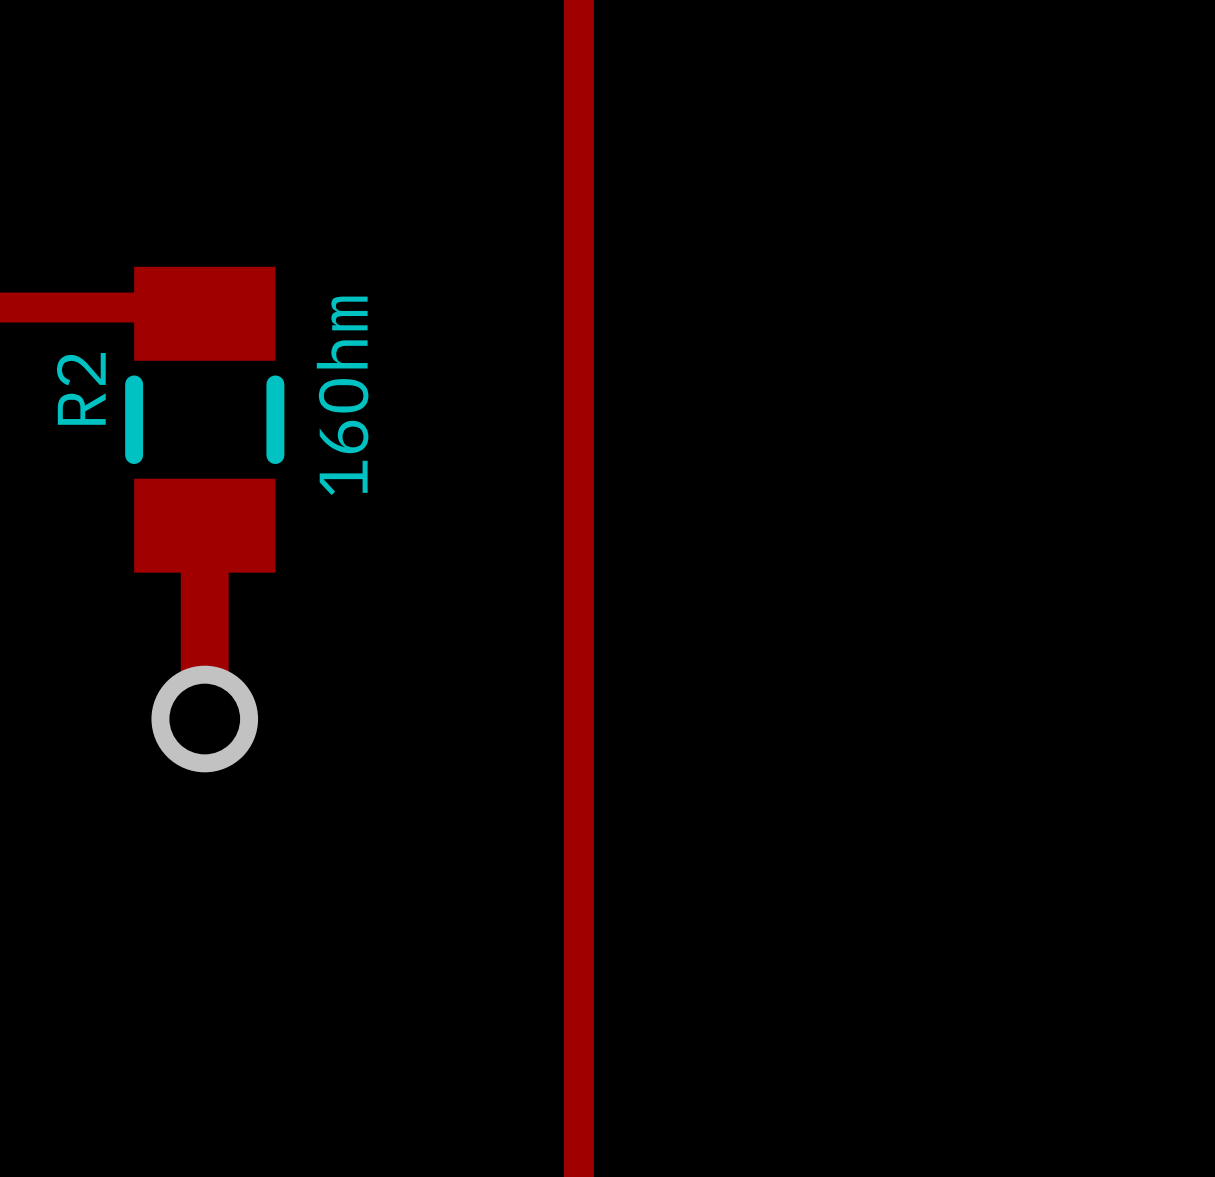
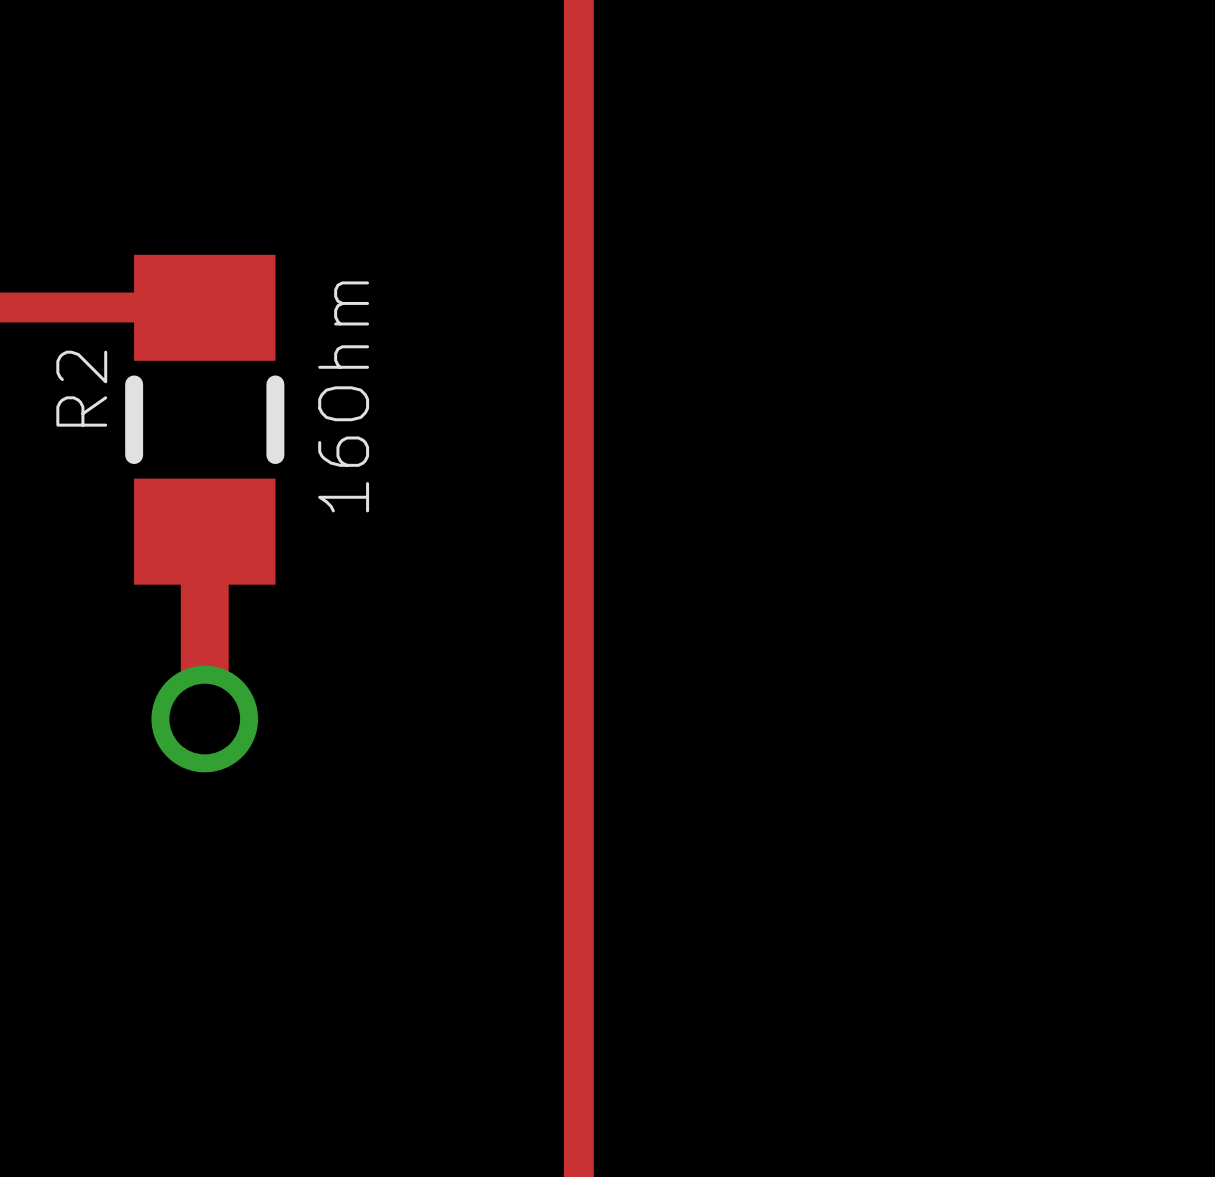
R2 footprint: [125, 266, 285, 573] -> [125, 254, 285, 585]

